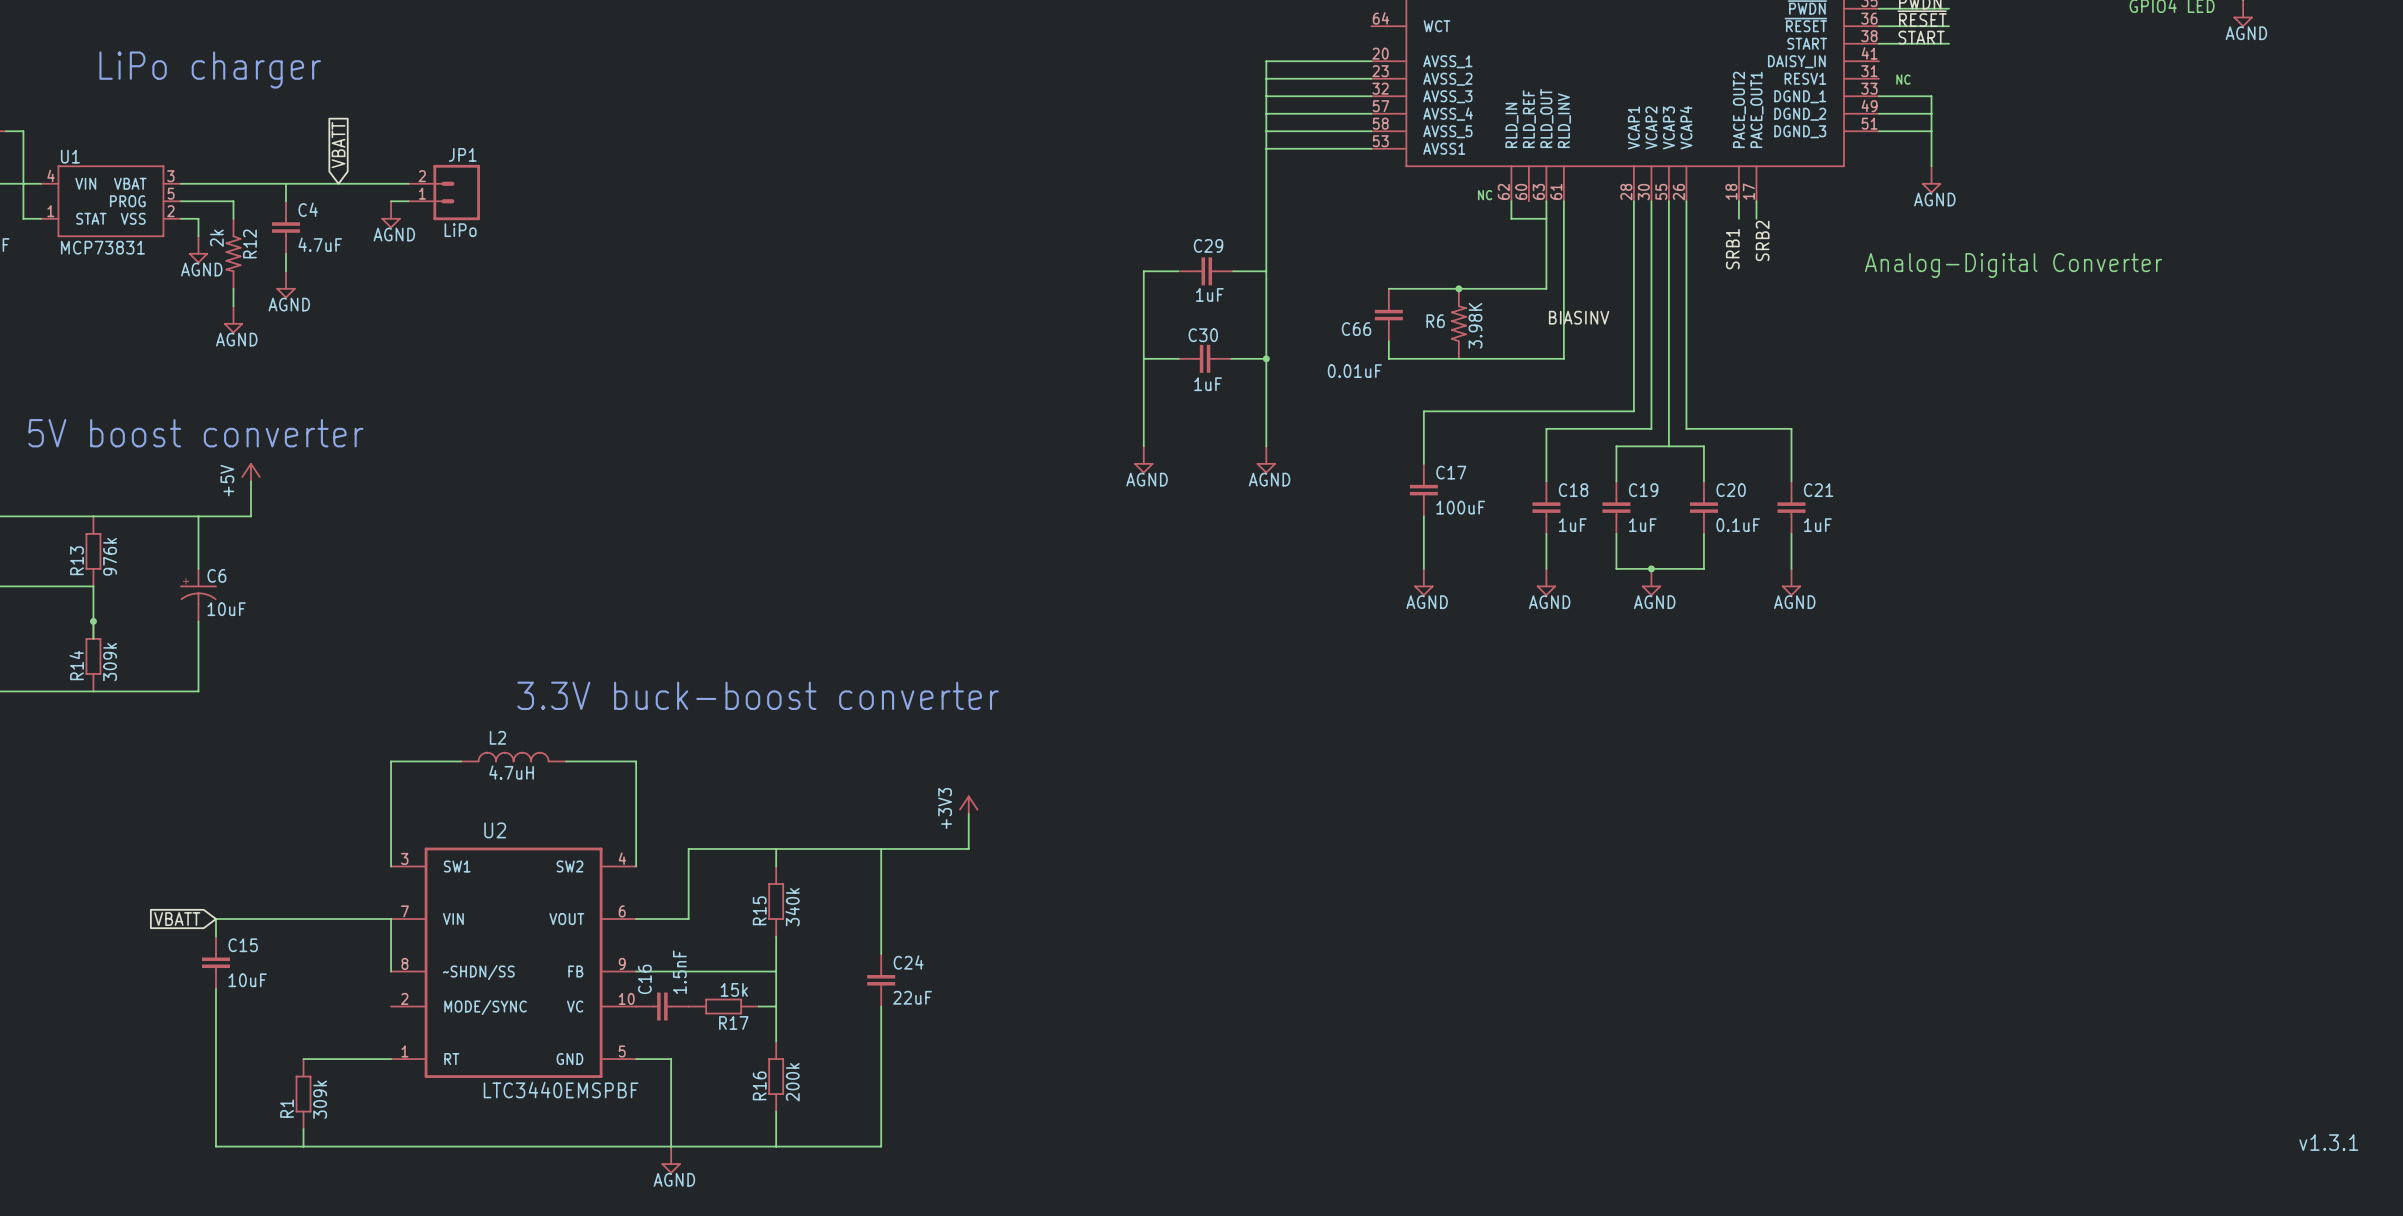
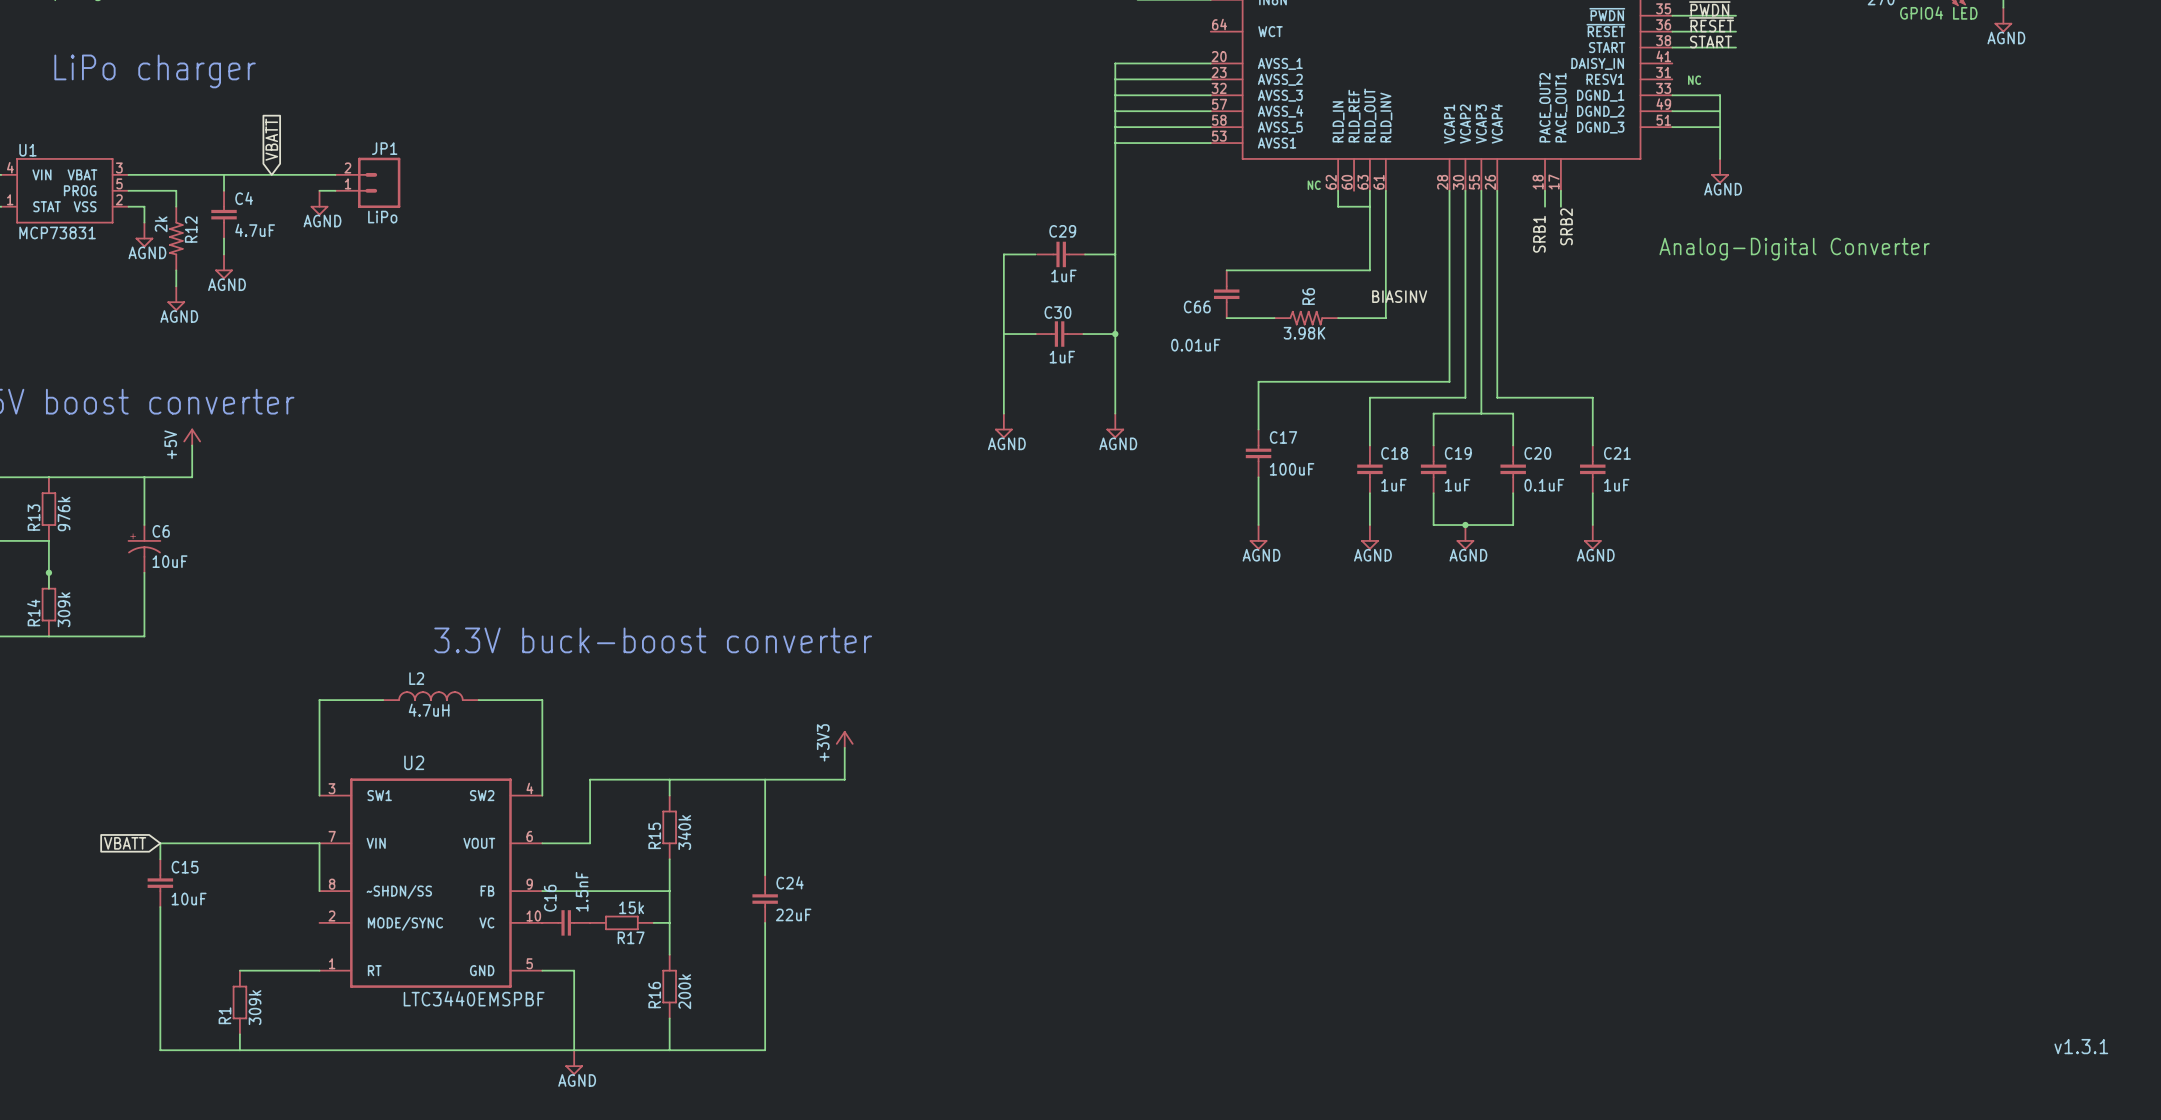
junction: (1458, 288) -> none
R6 rotation: 0° (1458, 323) -> 90° clockwise (1306, 318)
wire: (1388, 341) (1388, 358) (1563, 358) (1563, 341) -> (1226, 318) (1274, 318)
wire: none -> (1338, 318) (1385, 318)

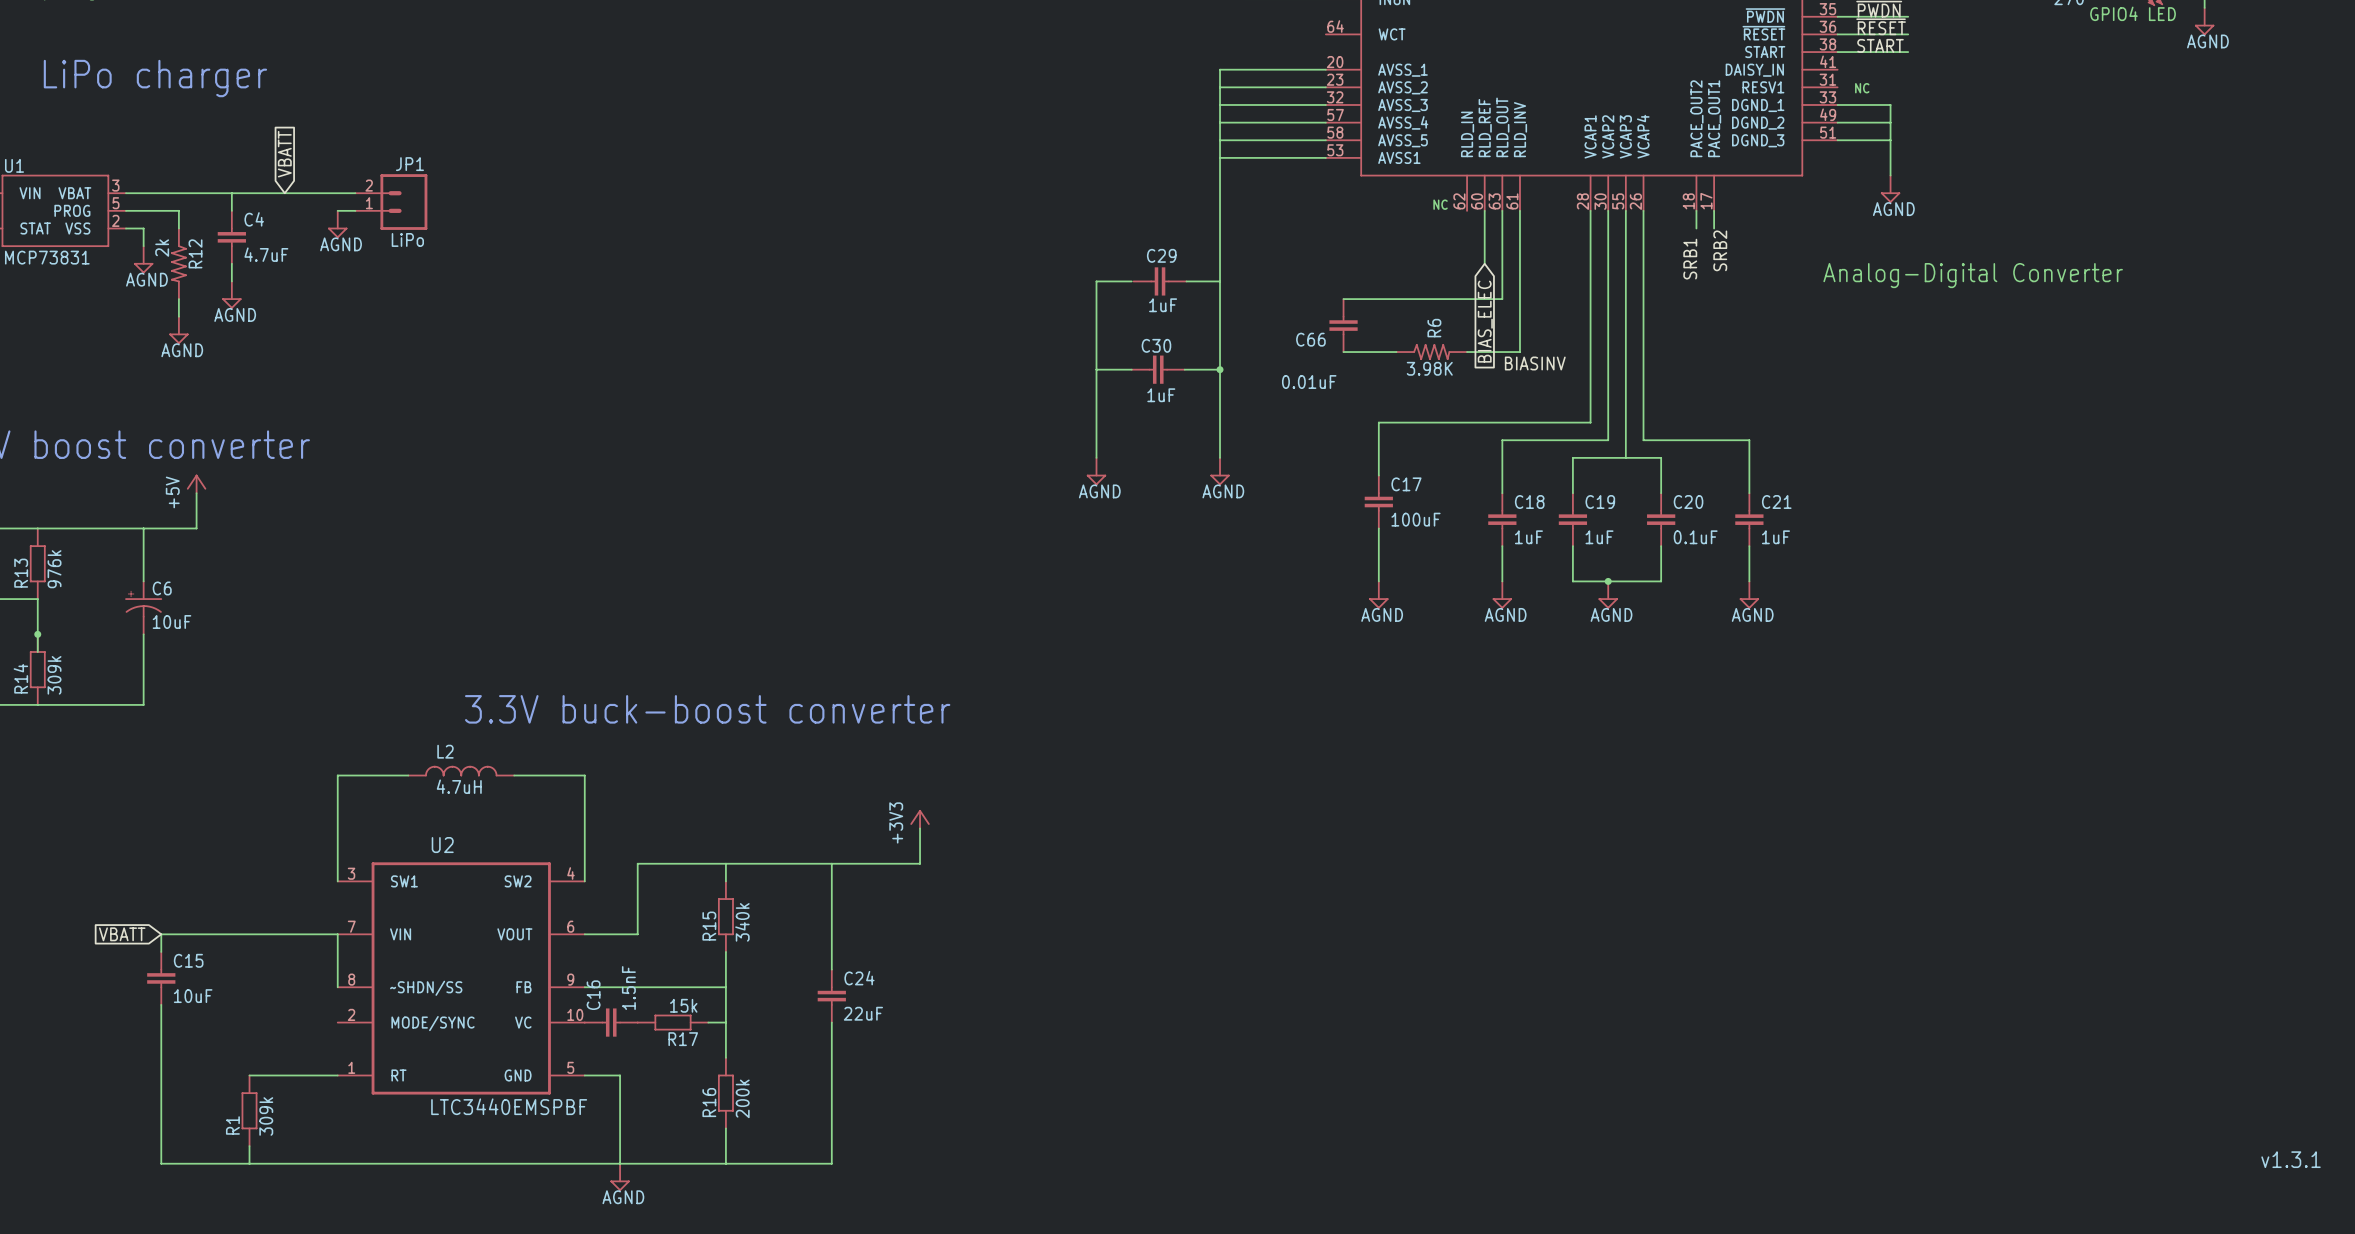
wire: (1338, 190) (1338, 206) (1369, 206) -> none
wire: none -> (1484, 210) (1484, 263)
global label: none -> BIAS_ELEC (1485, 321)
label position: BIASINV (1399, 296) -> BIASINV (1535, 363)

